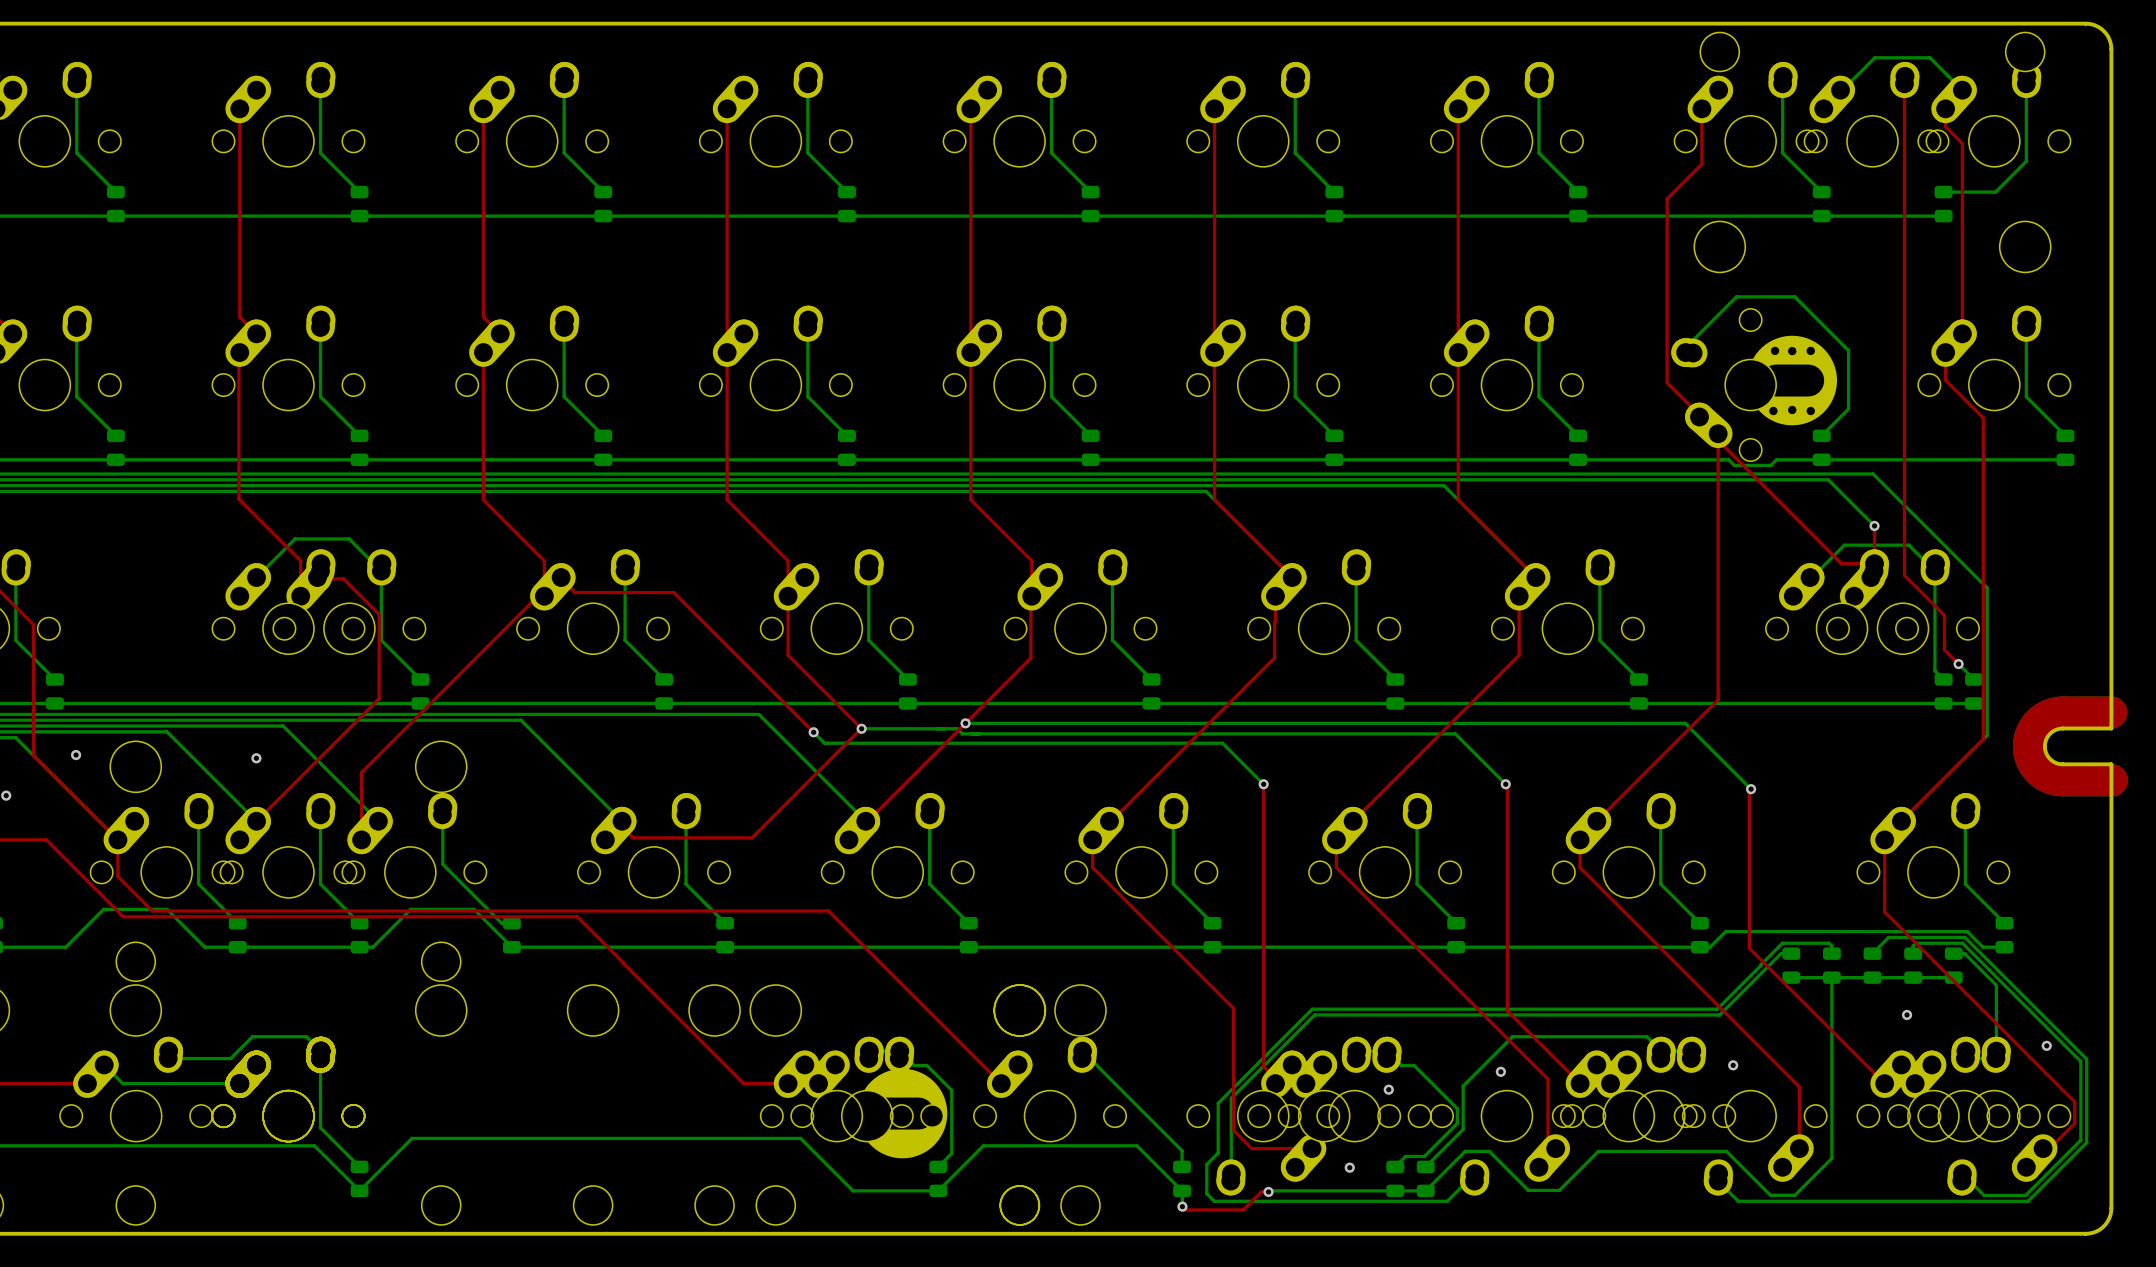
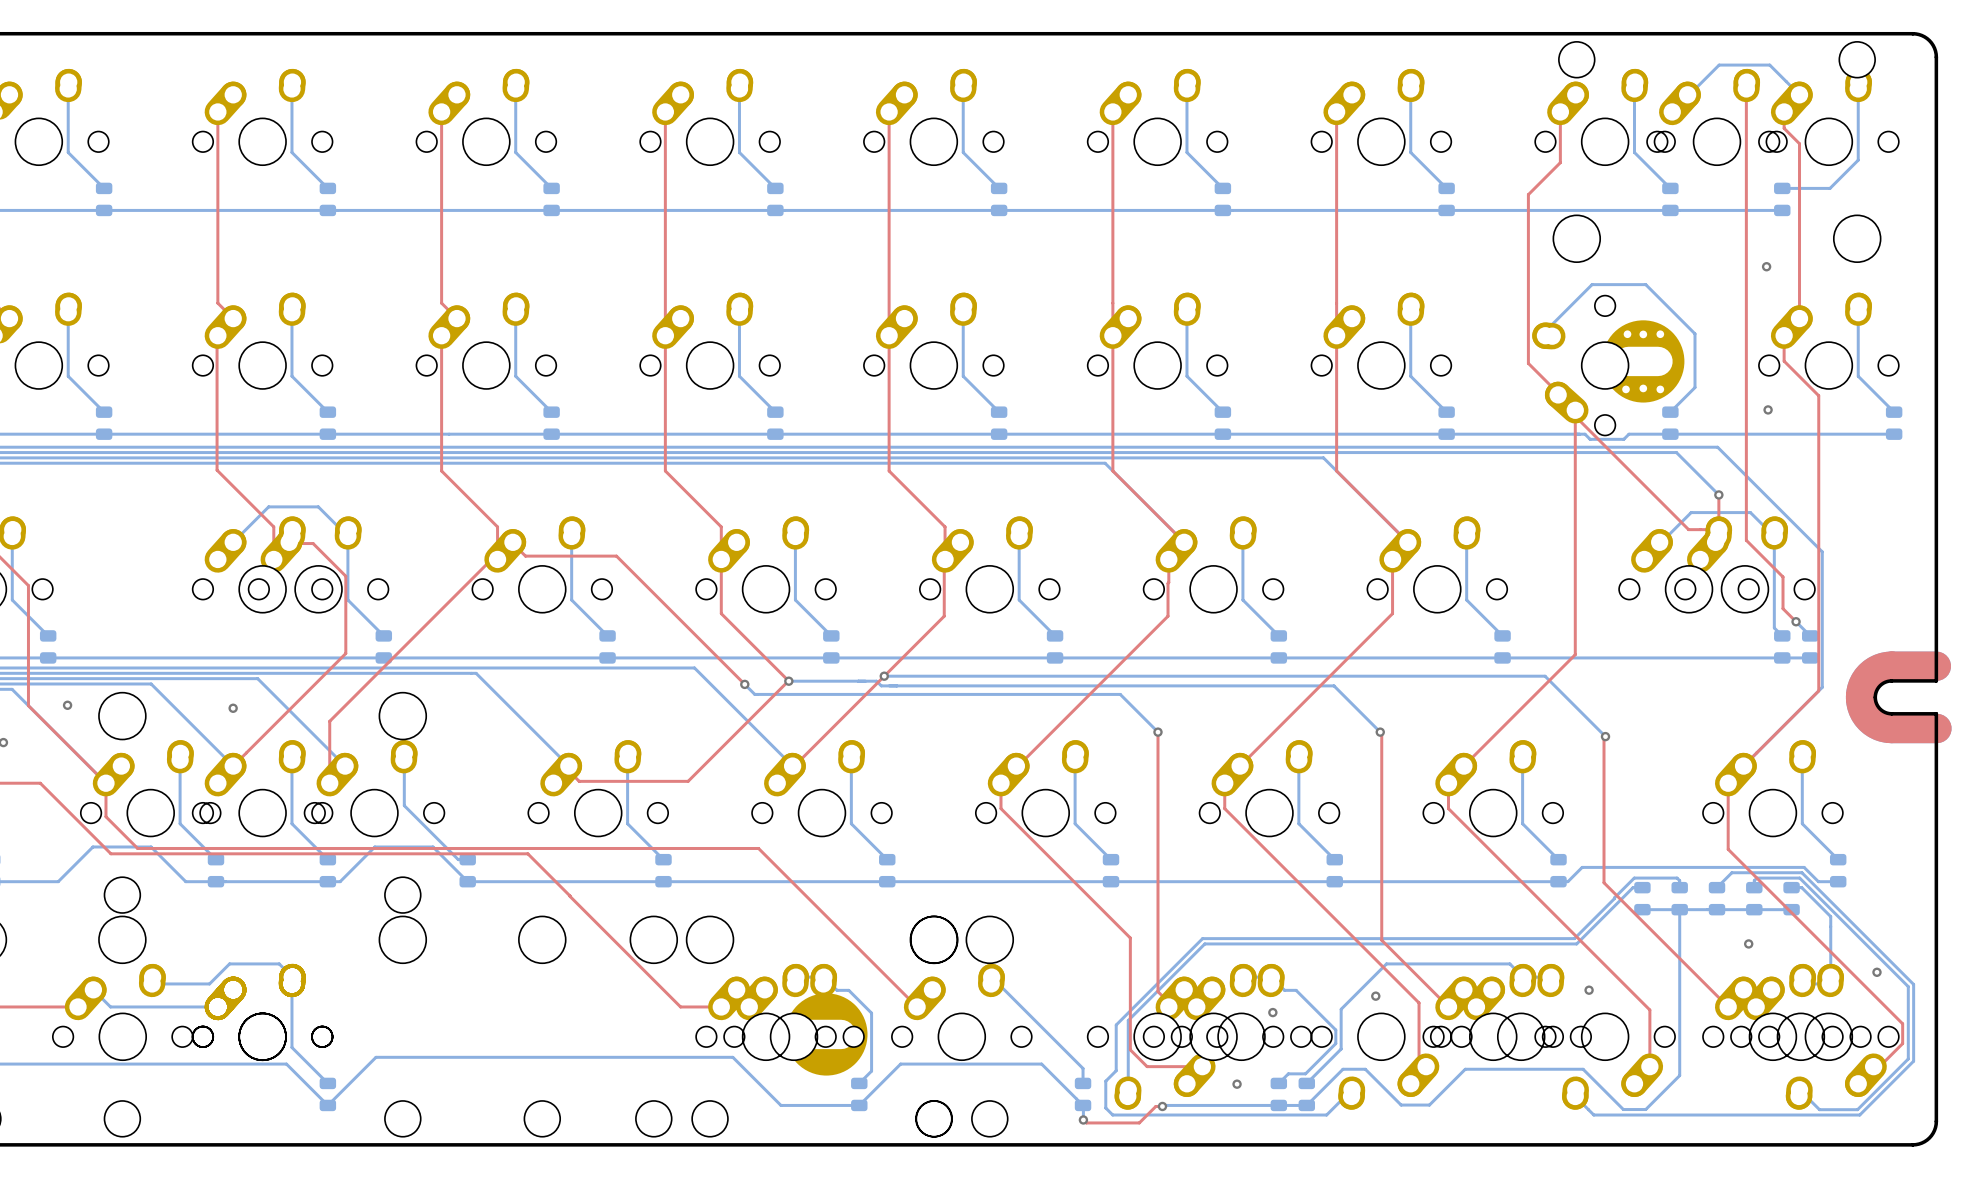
via: none -> (1766, 266)
via: none -> (1768, 409)

